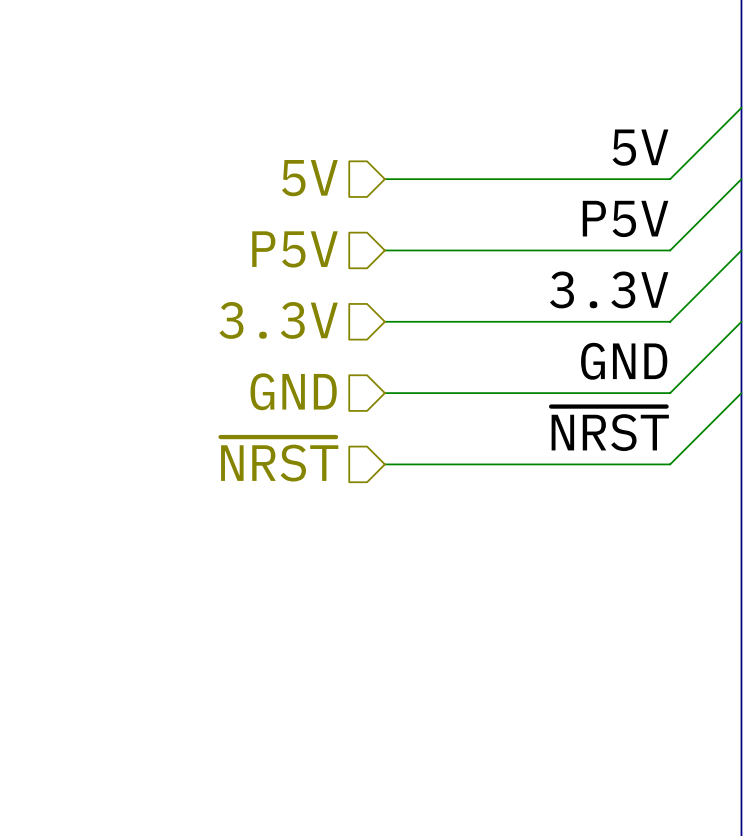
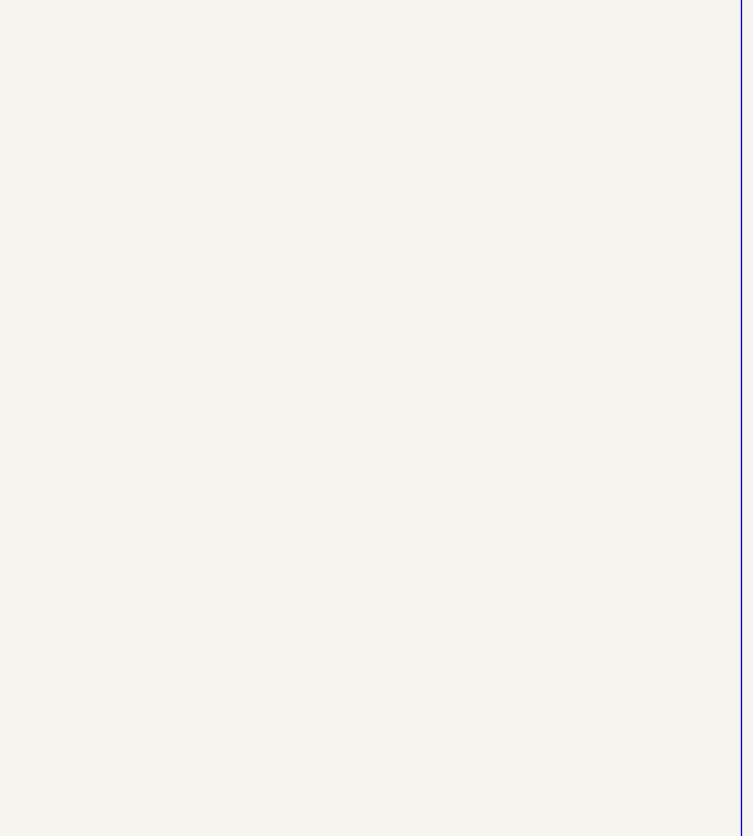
wire: (741, 107) (670, 179) (384, 179) -> none
label: 5V (640, 147) -> none
hierarchical label: 5V (309, 178) -> none
wire: (741, 179) (670, 250) (384, 250) -> none
label: P5V (625, 218) -> none
hierarchical label: P5V (295, 249) -> none
wire: (741, 250) (670, 321) (384, 321) -> none
label: 3.3V (609, 289) -> none
hierarchical label: 3.3V (278, 320) -> none
wire: (741, 321) (670, 393) (384, 393) -> none
label: GND (624, 361) -> none
hierarchical label: GND (293, 391) -> none
wire: (741, 393) (670, 464) (384, 464) -> none
label: ~{NRST} (609, 428) -> none
hierarchical label: ~{NRST} (279, 459) -> none

